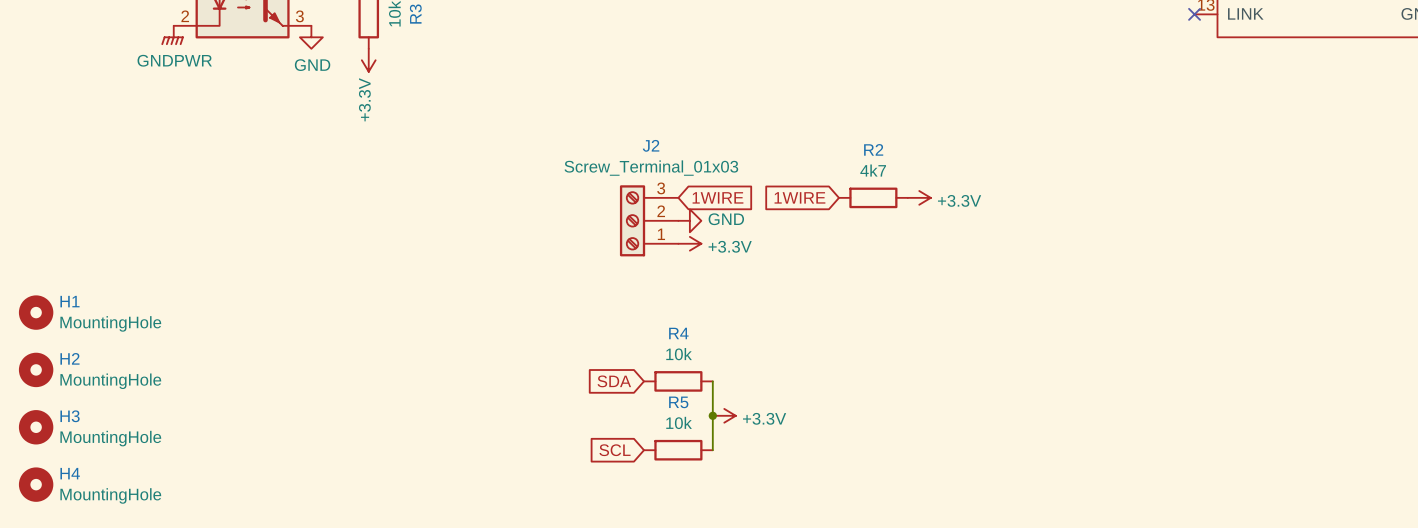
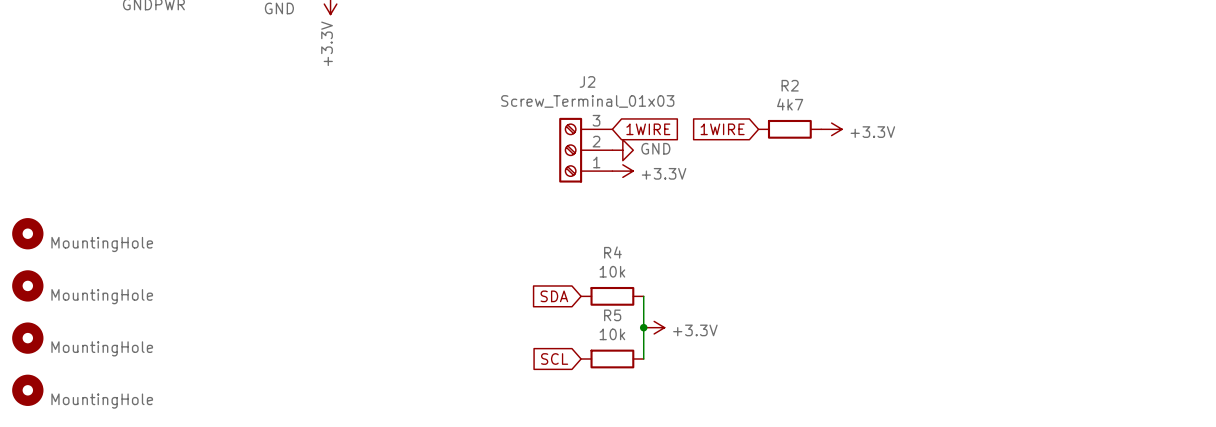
H1 name: H1 (69, 301) -> none
H2 name: H2 (69, 358) -> none
H3 name: H3 (70, 416) -> none
H4 name: H4 (70, 473) -> none

